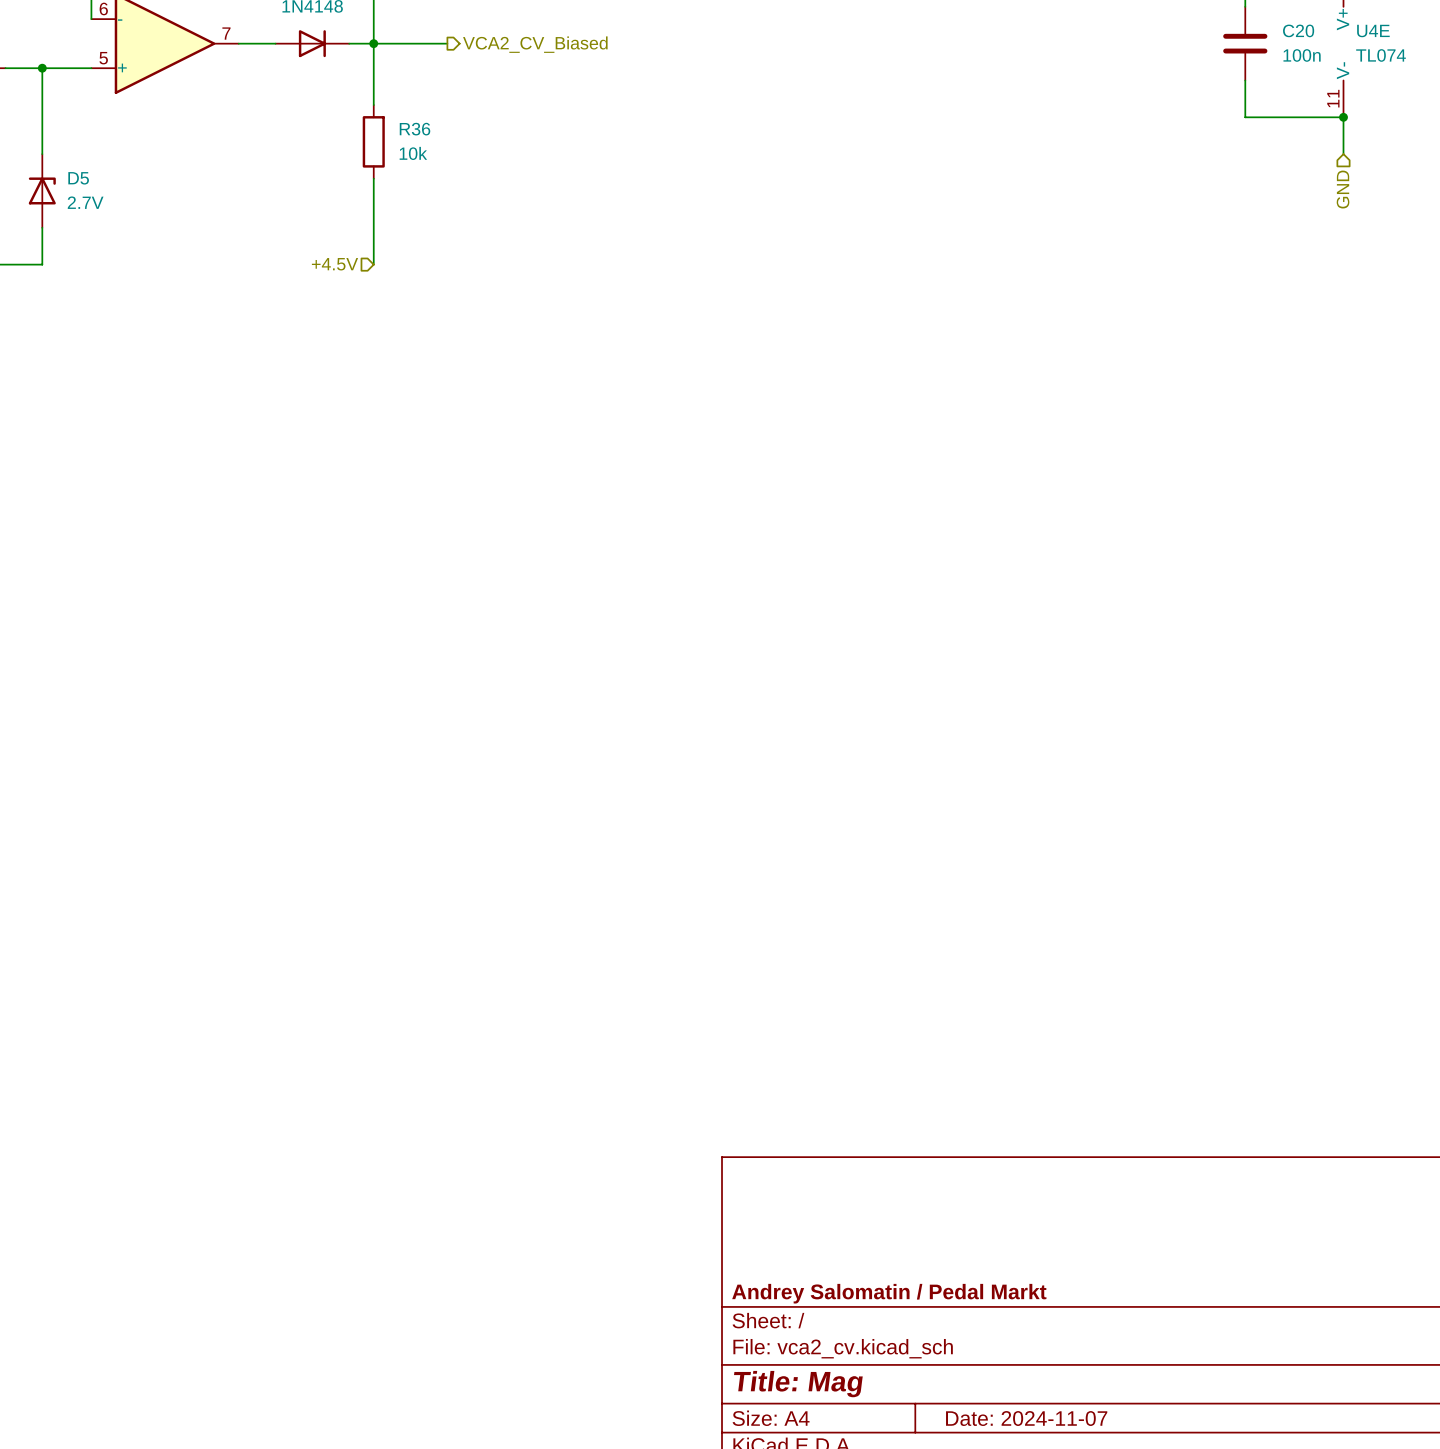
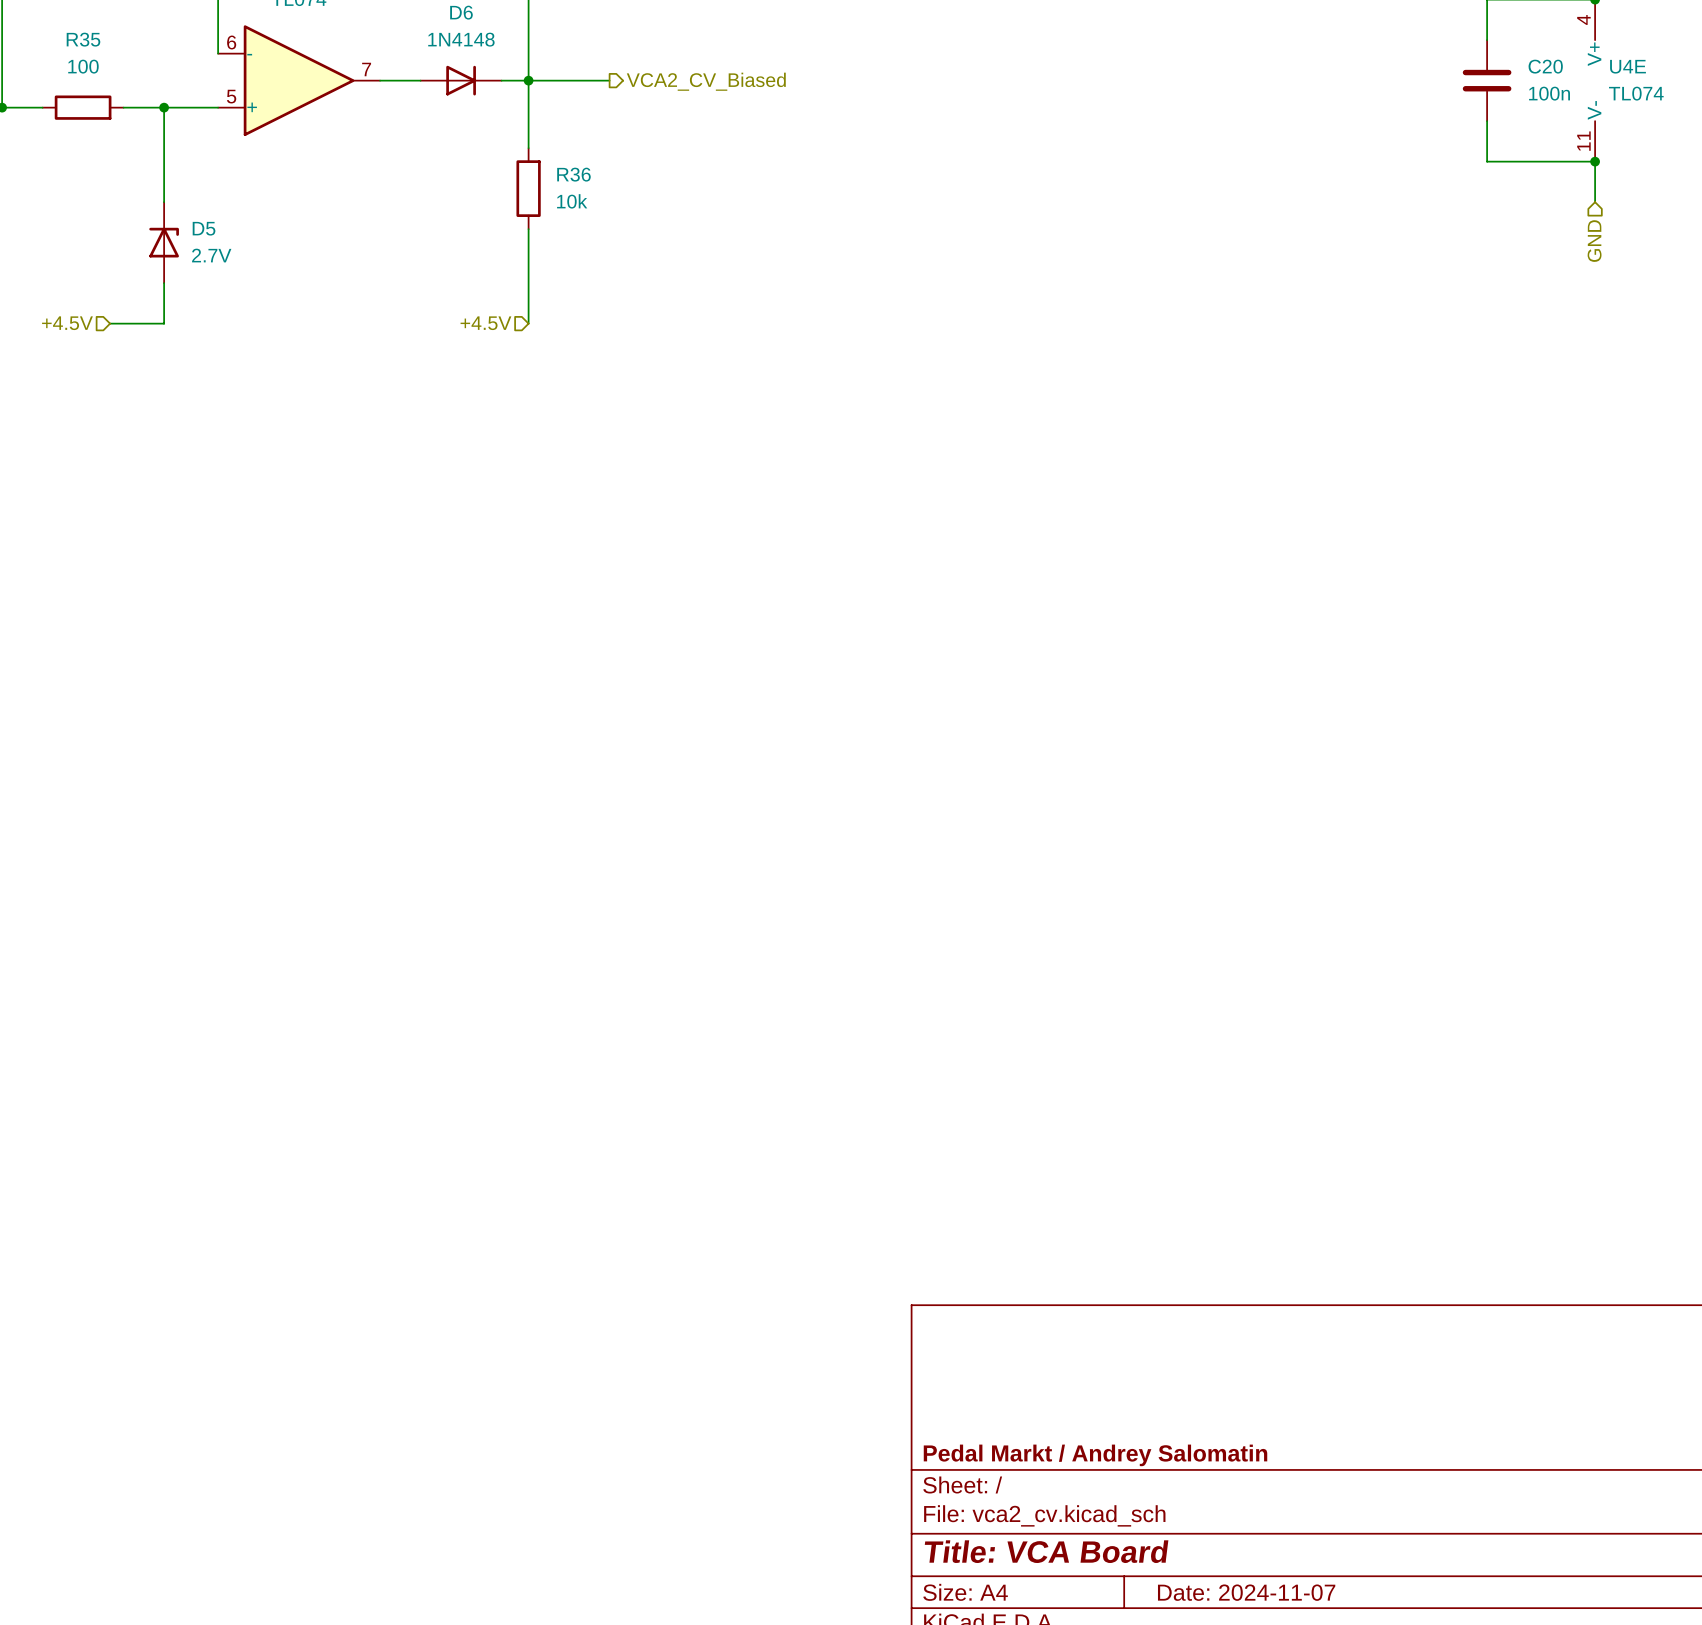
title block: Andrey Salomatin / Pedal Markt (889, 1293) -> Pedal Markt / Andrey Salomatin (1095, 1455)
title block: Title: Mag (798, 1384) -> Title: VCA Board (1046, 1551)

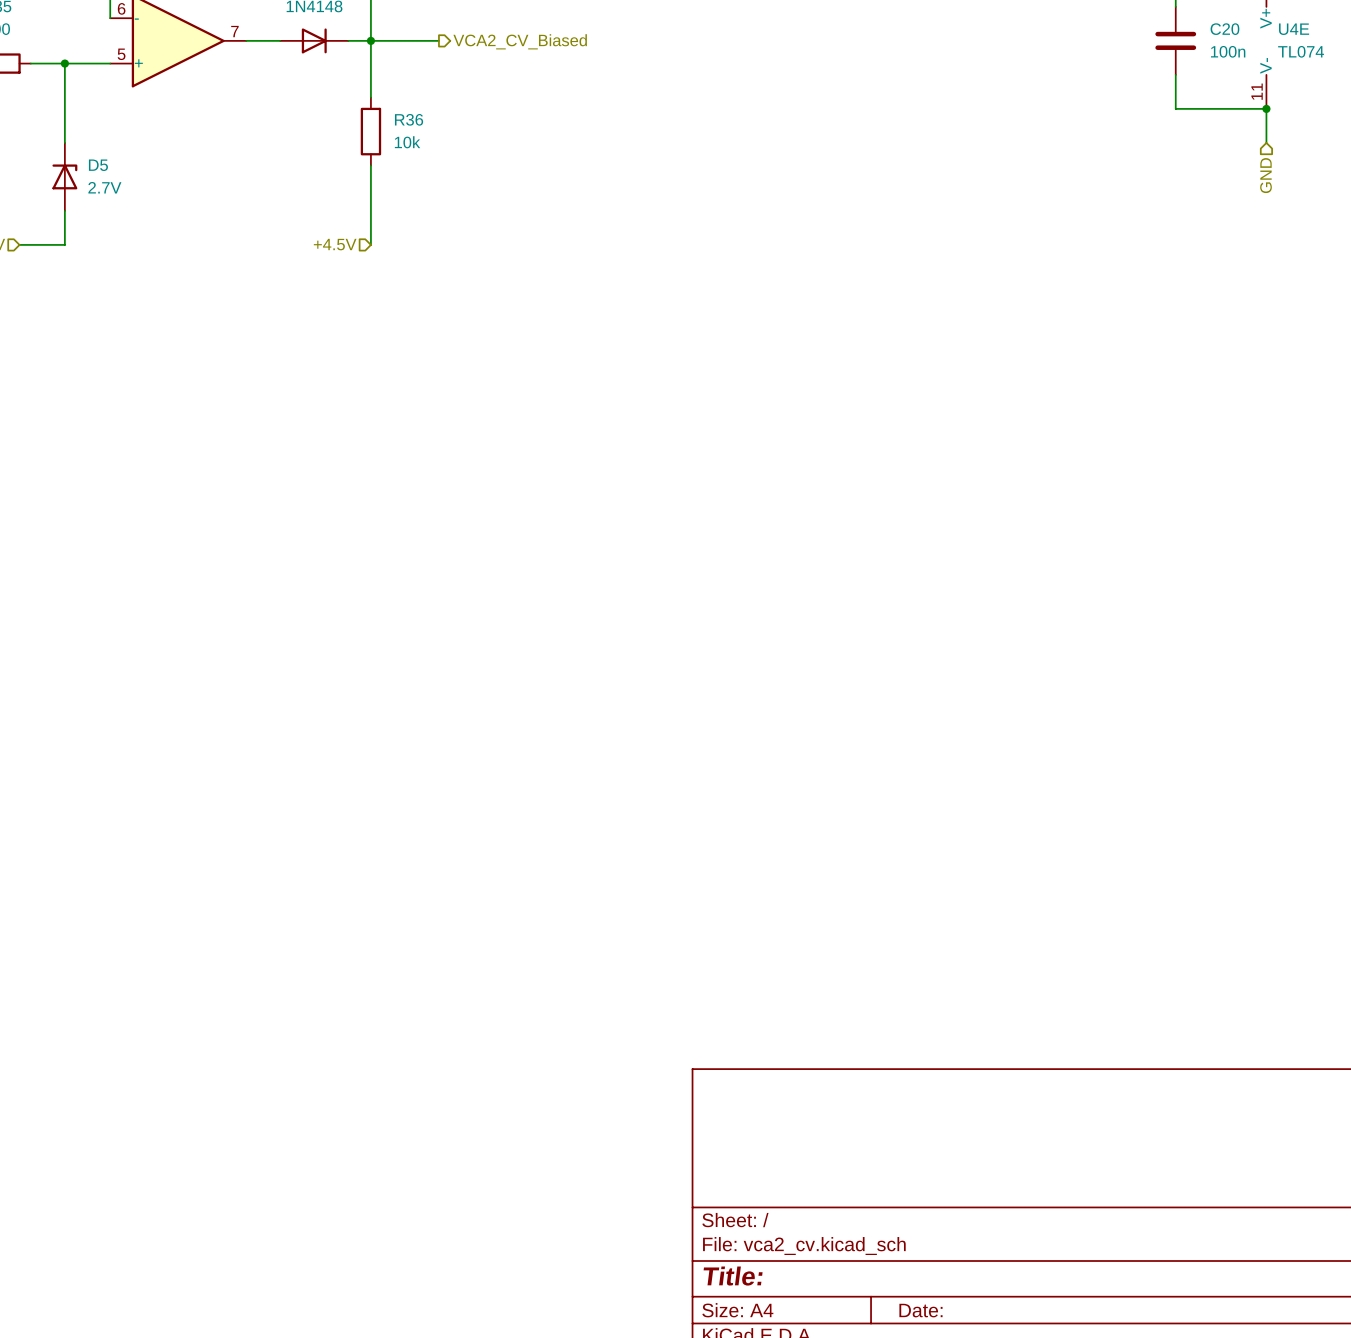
title block: Pedal Markt / Andrey Salomatin (1095, 1455) -> none
title block: Title: VCA Board (1046, 1551) -> Title: (733, 1276)
title block: Date: 2024-11-07 (1246, 1592) -> Date: (920, 1310)

